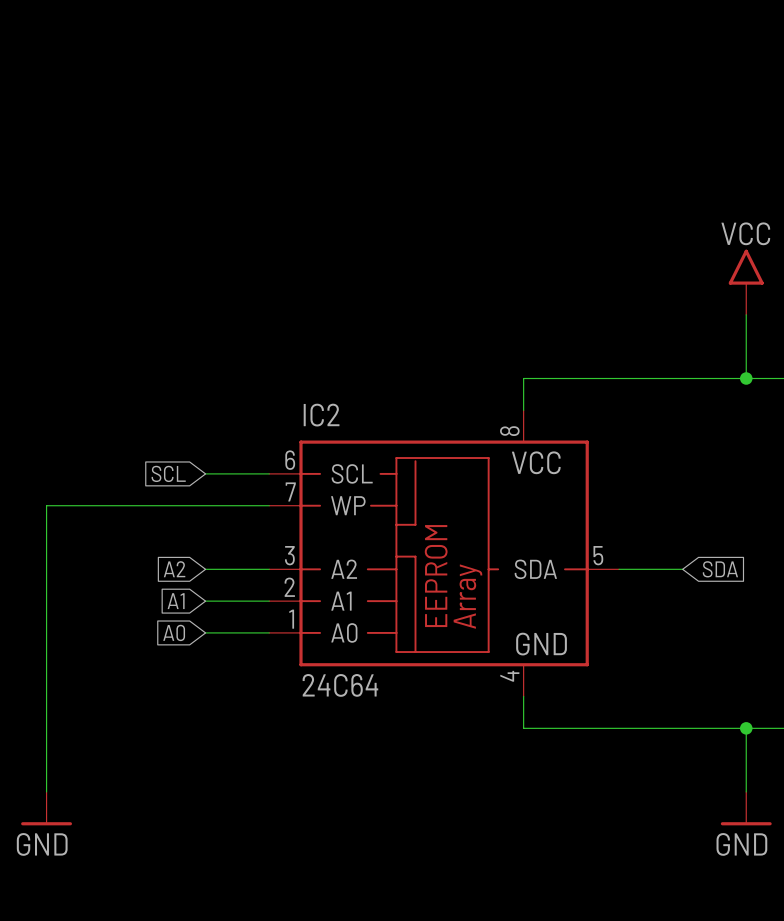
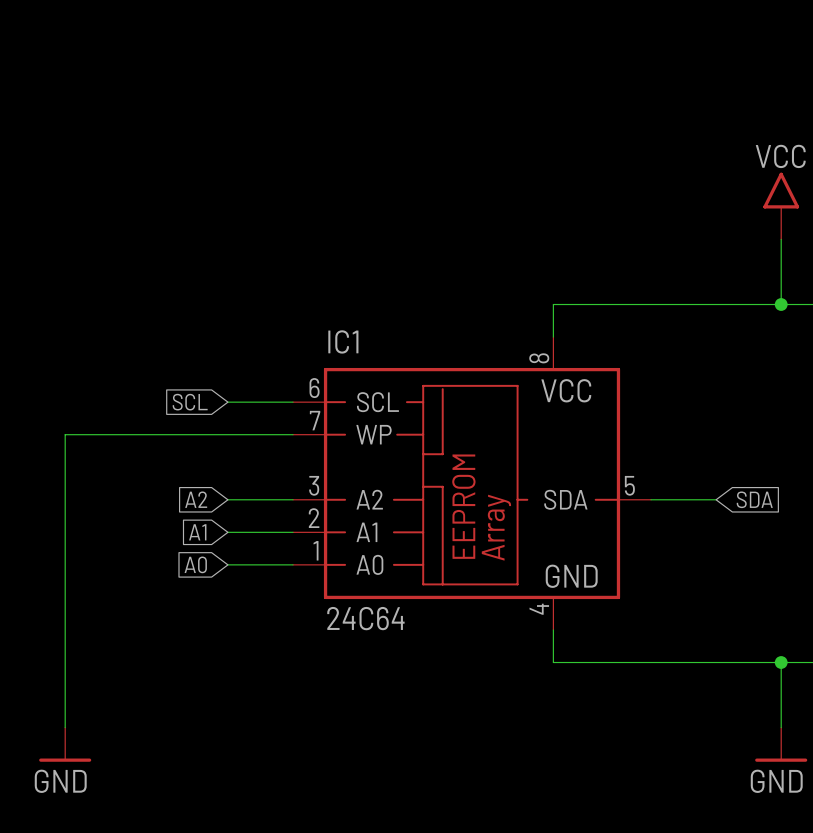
IC2 name: IC2 (321, 415) -> IC1 (343, 341)

